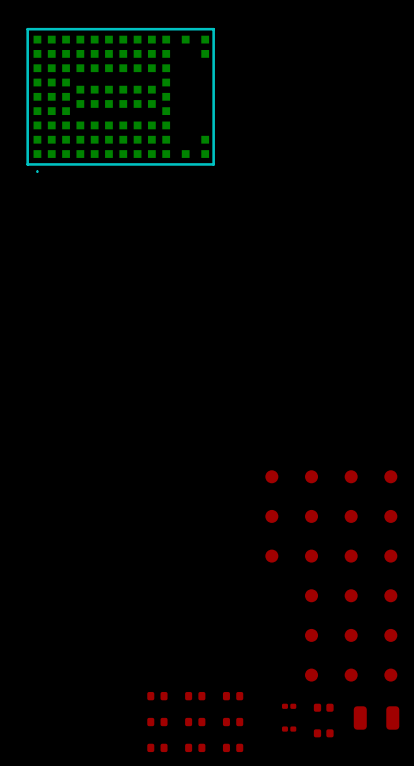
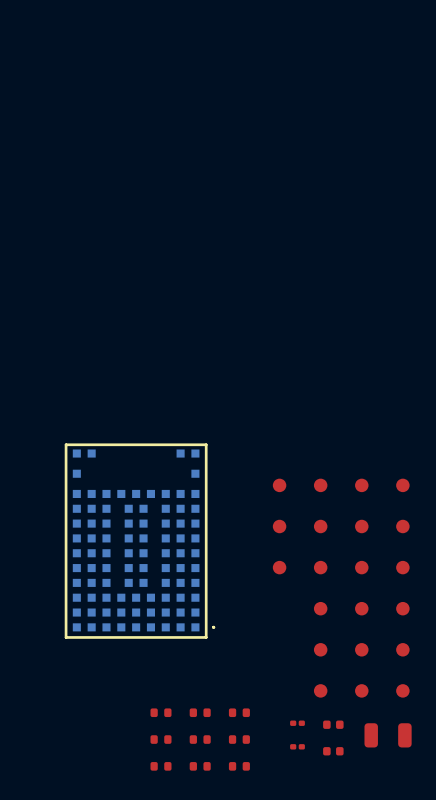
part: (120, 100) -> none
part: none -> (139, 541)

